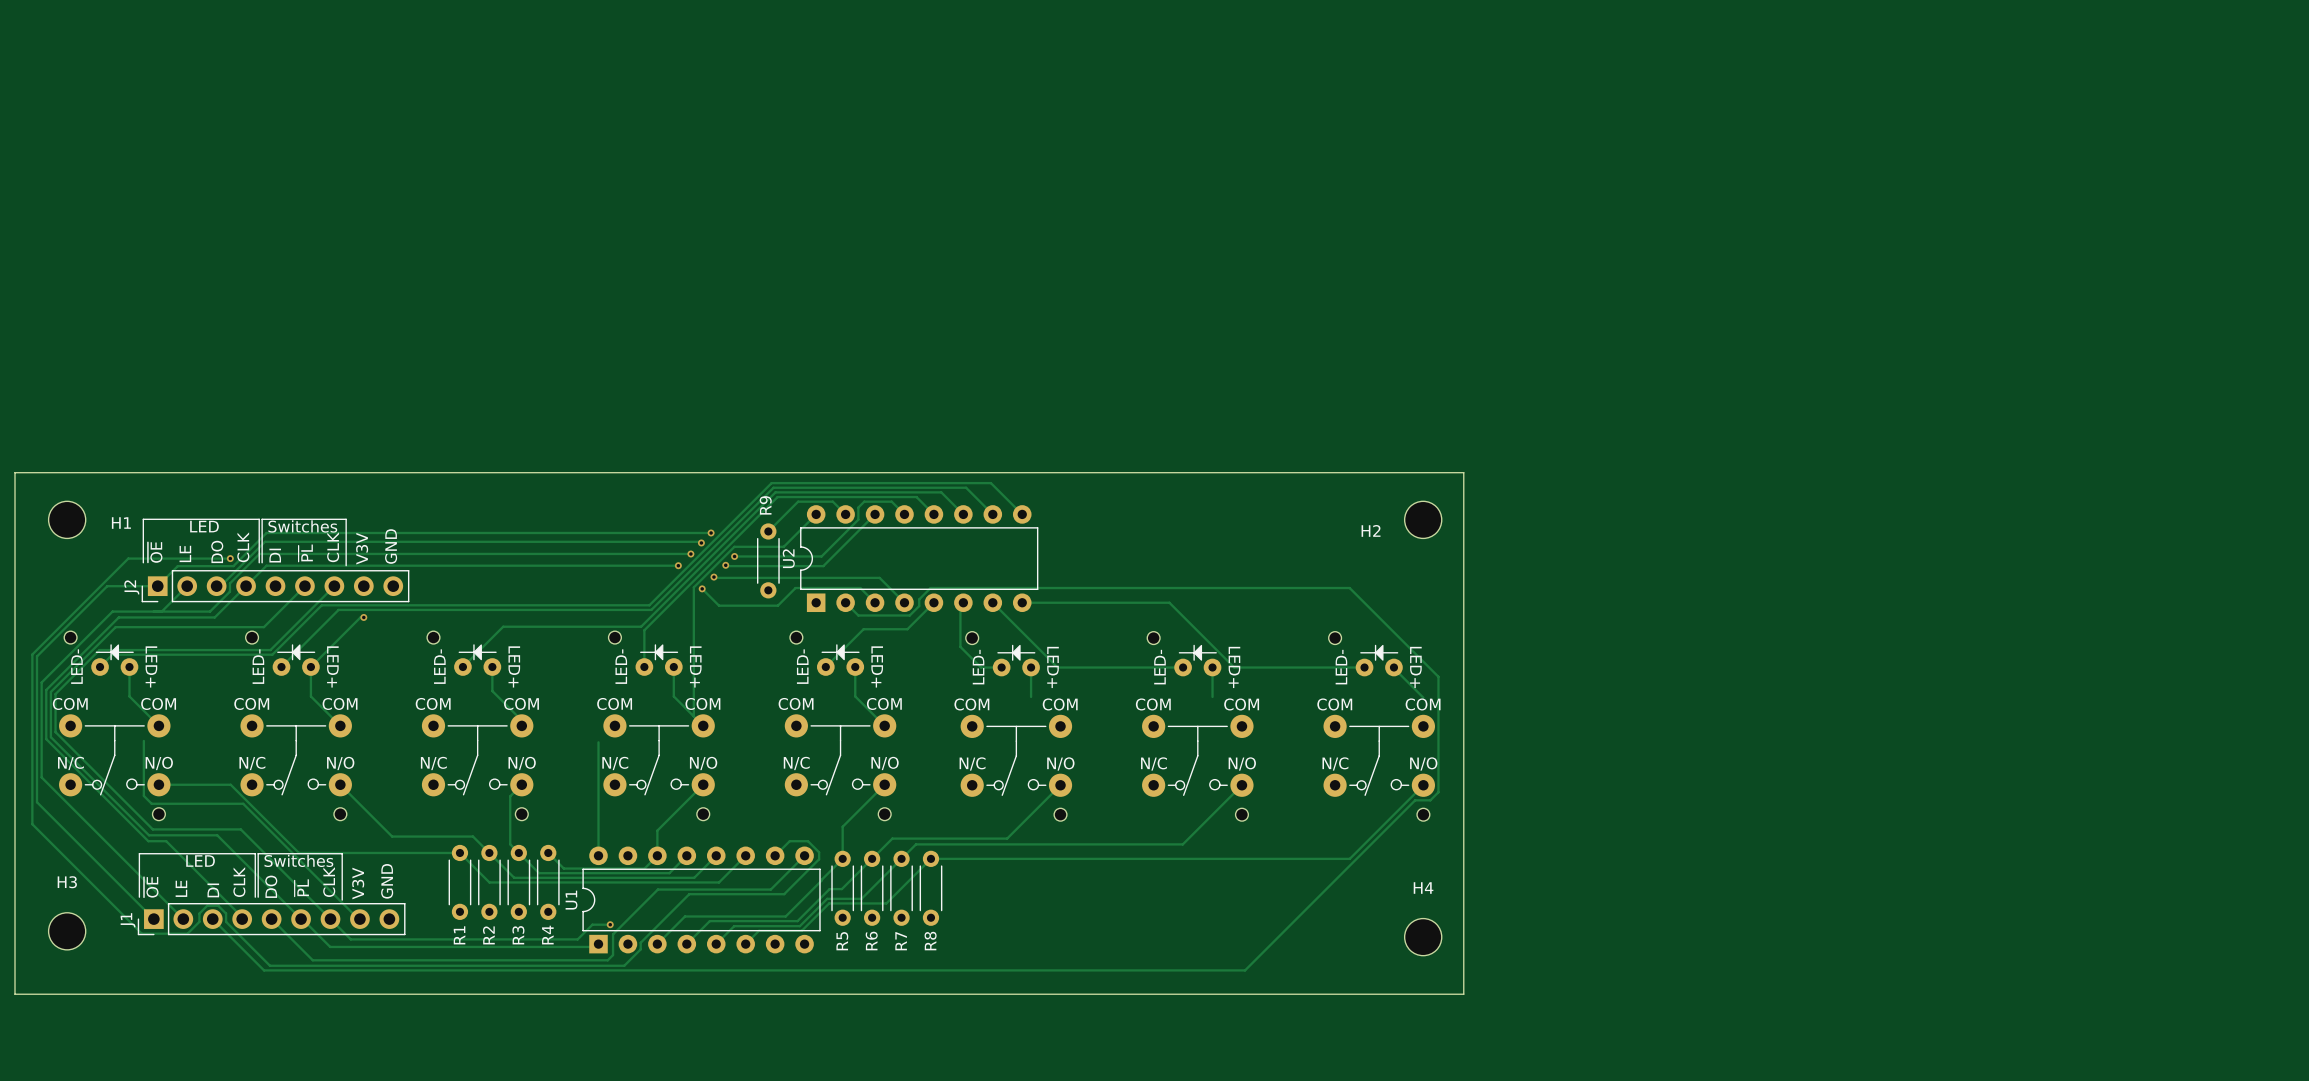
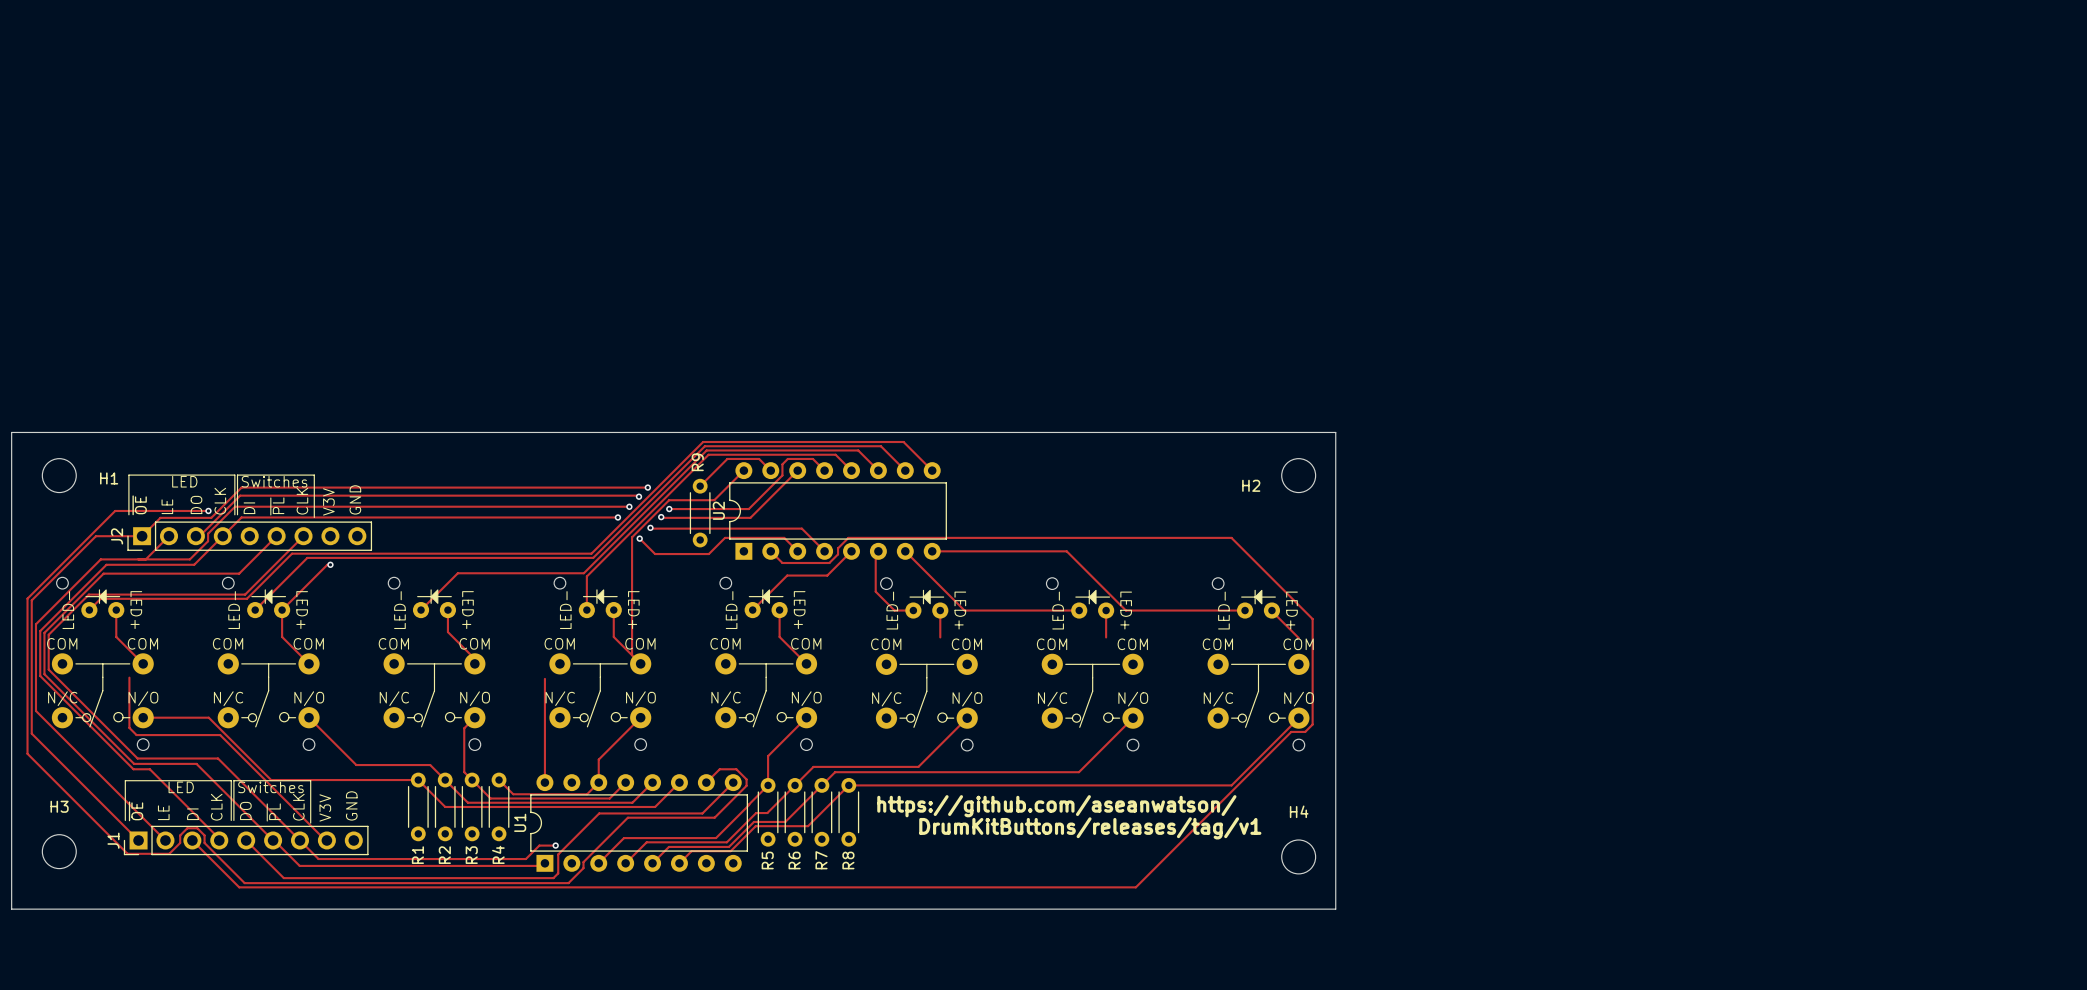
text: none -> https://github.com/aseanwatson/ (1056, 806)
text: none -> DrumKitButtons/releases/tag/v1 (1090, 828)

